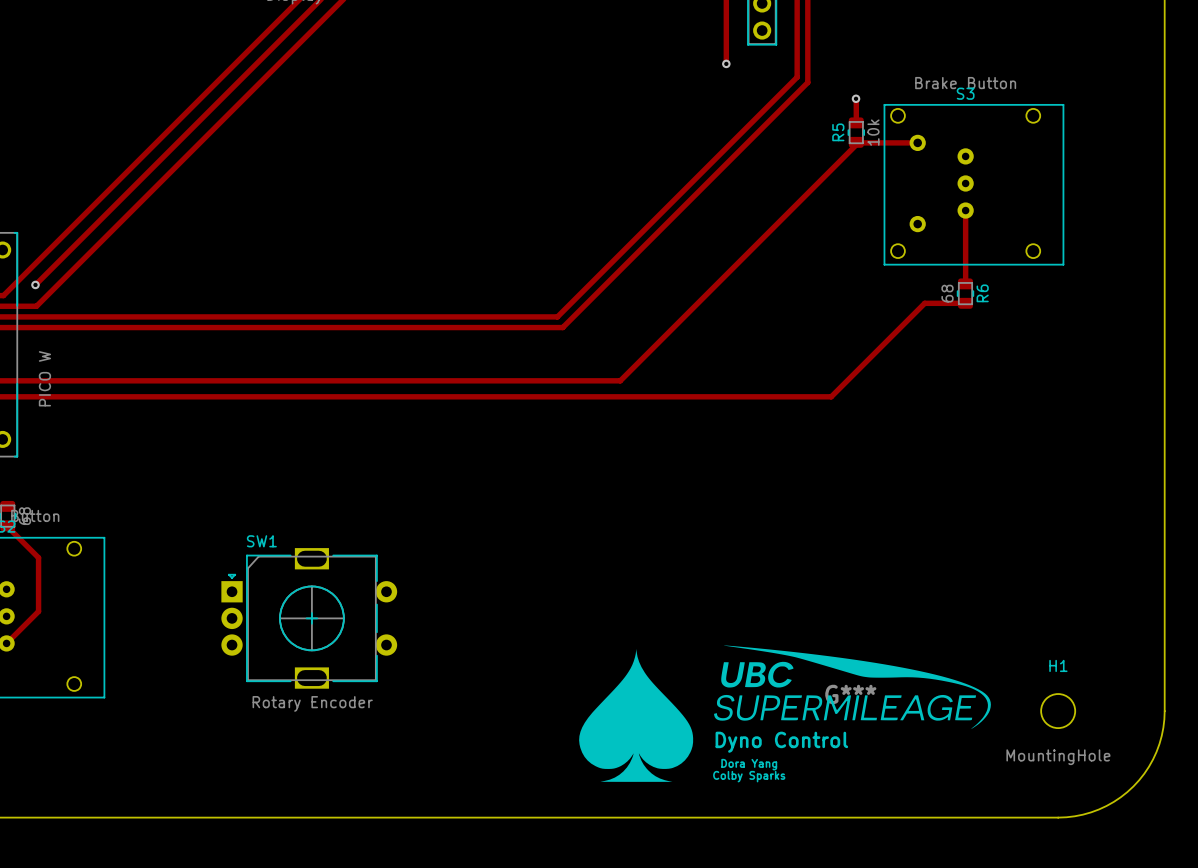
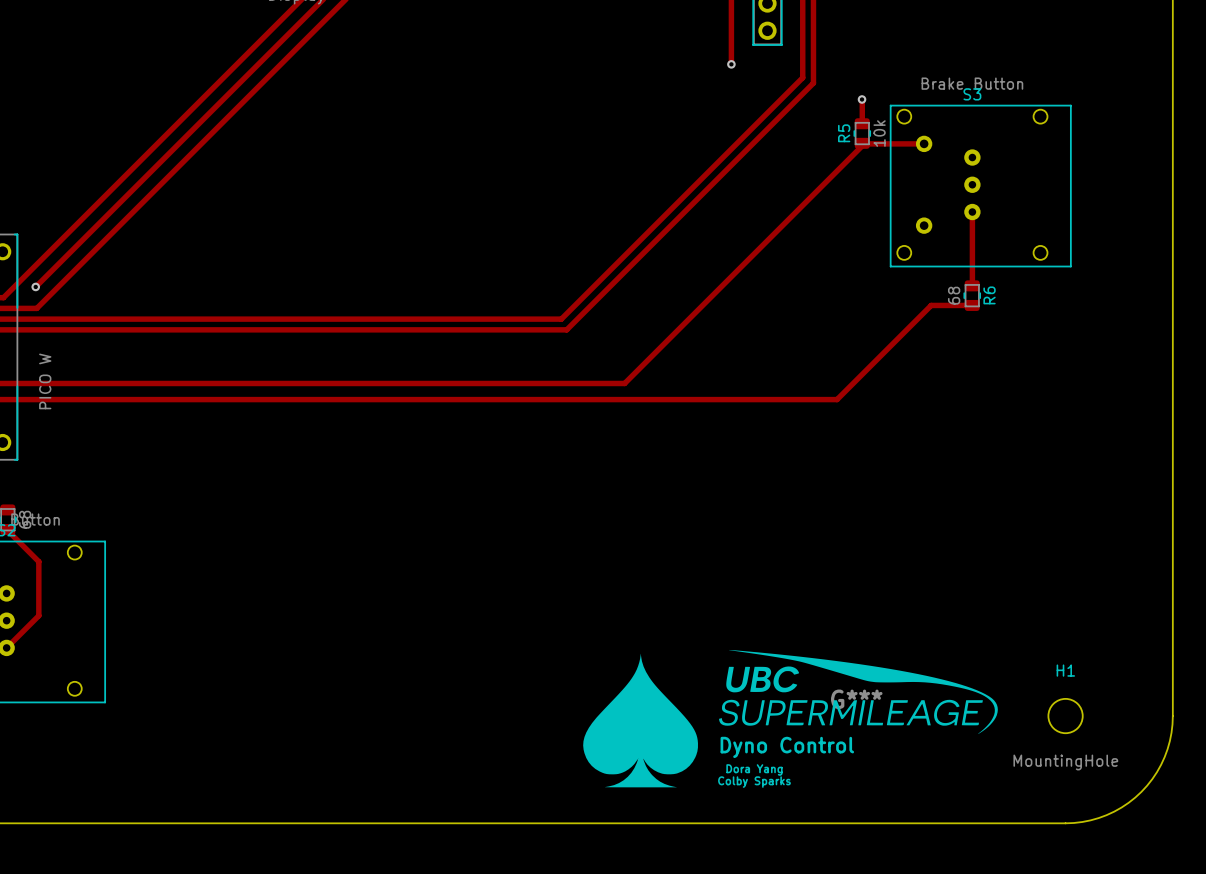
SW1: Rotary Encoder (309, 618) -> none

